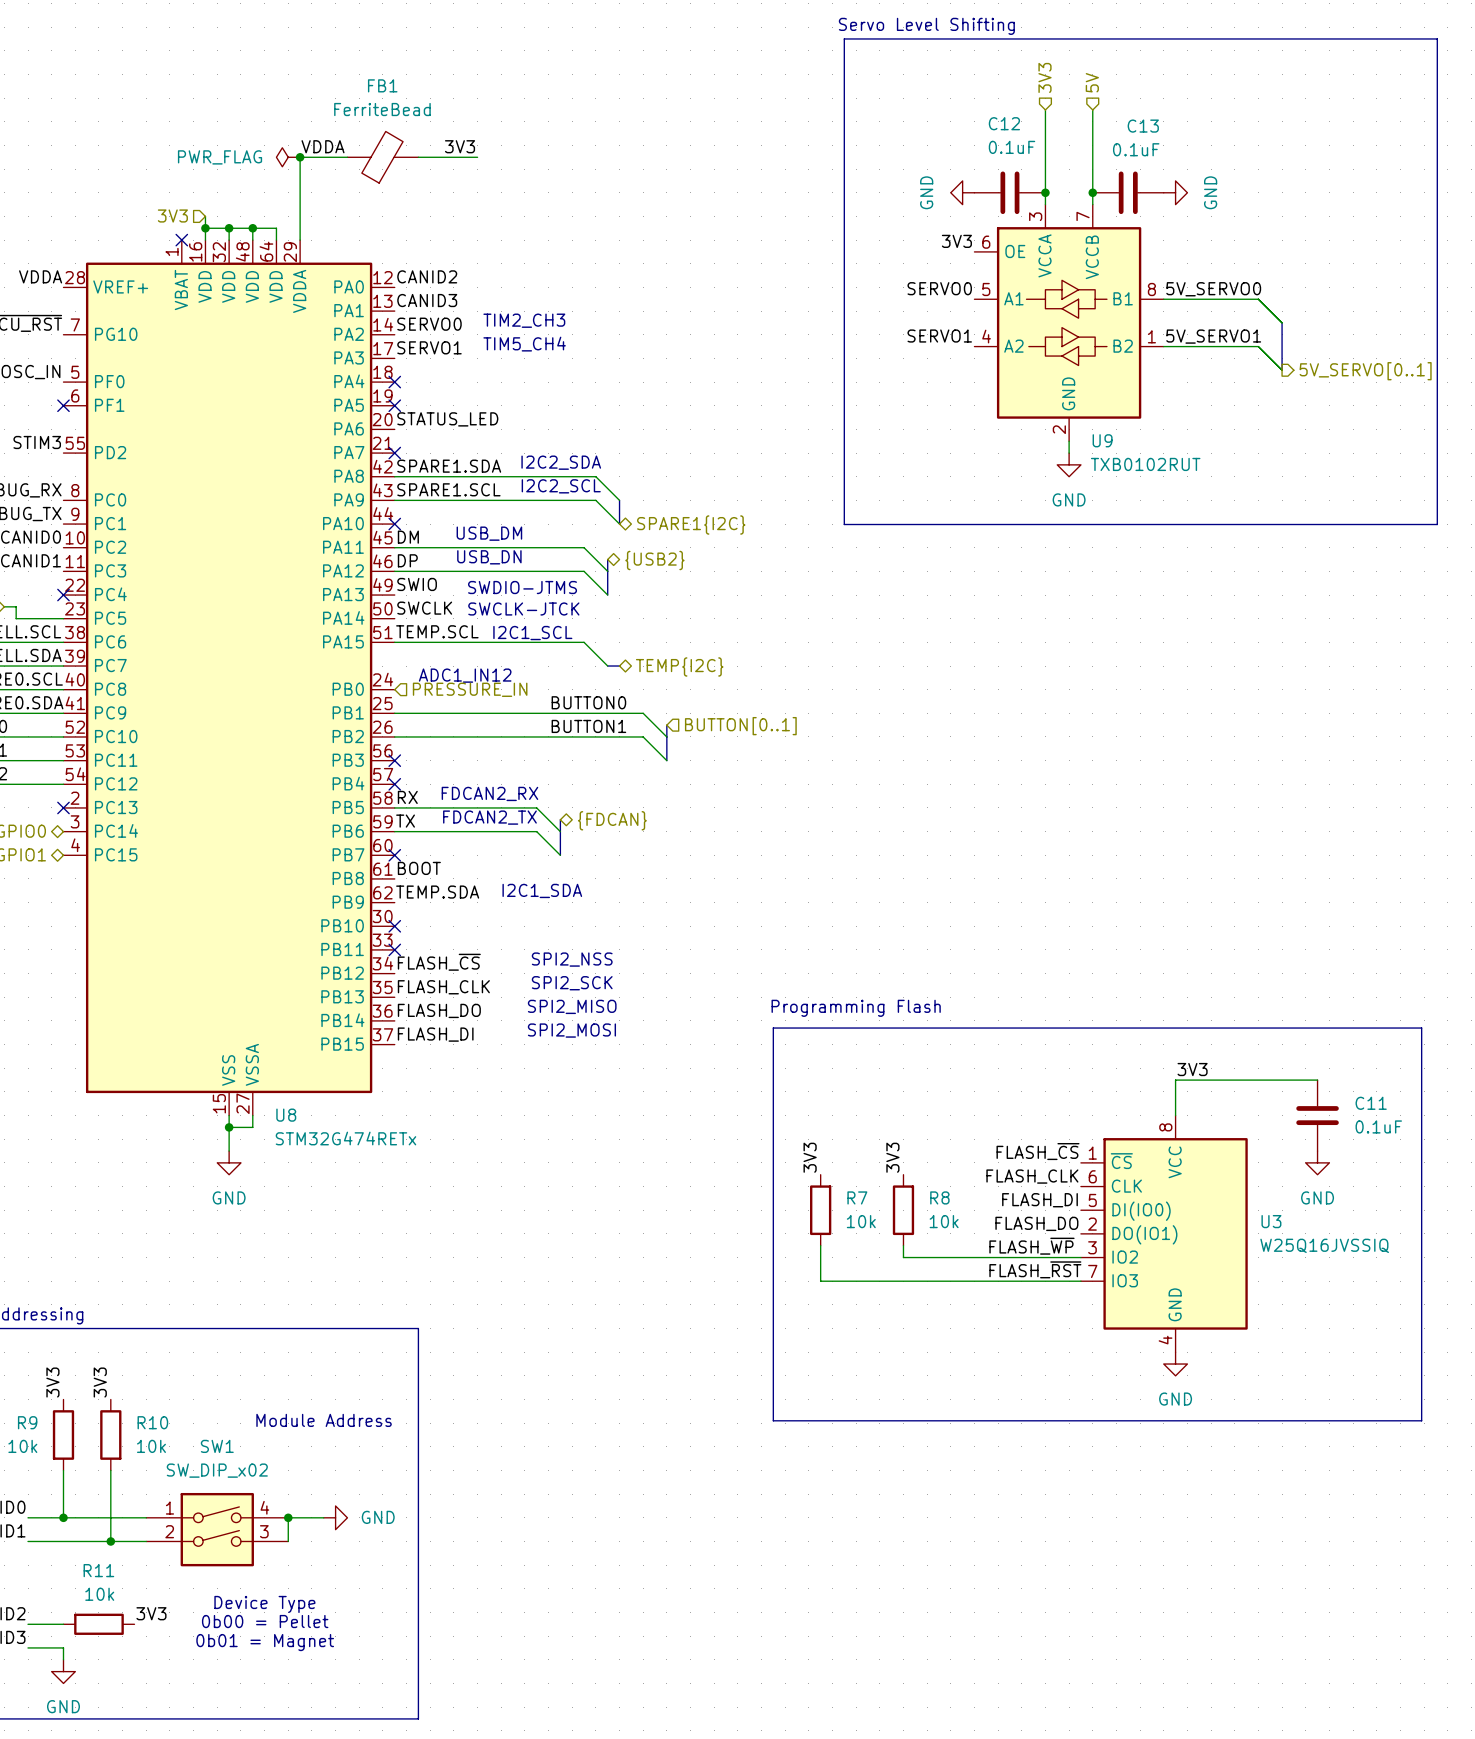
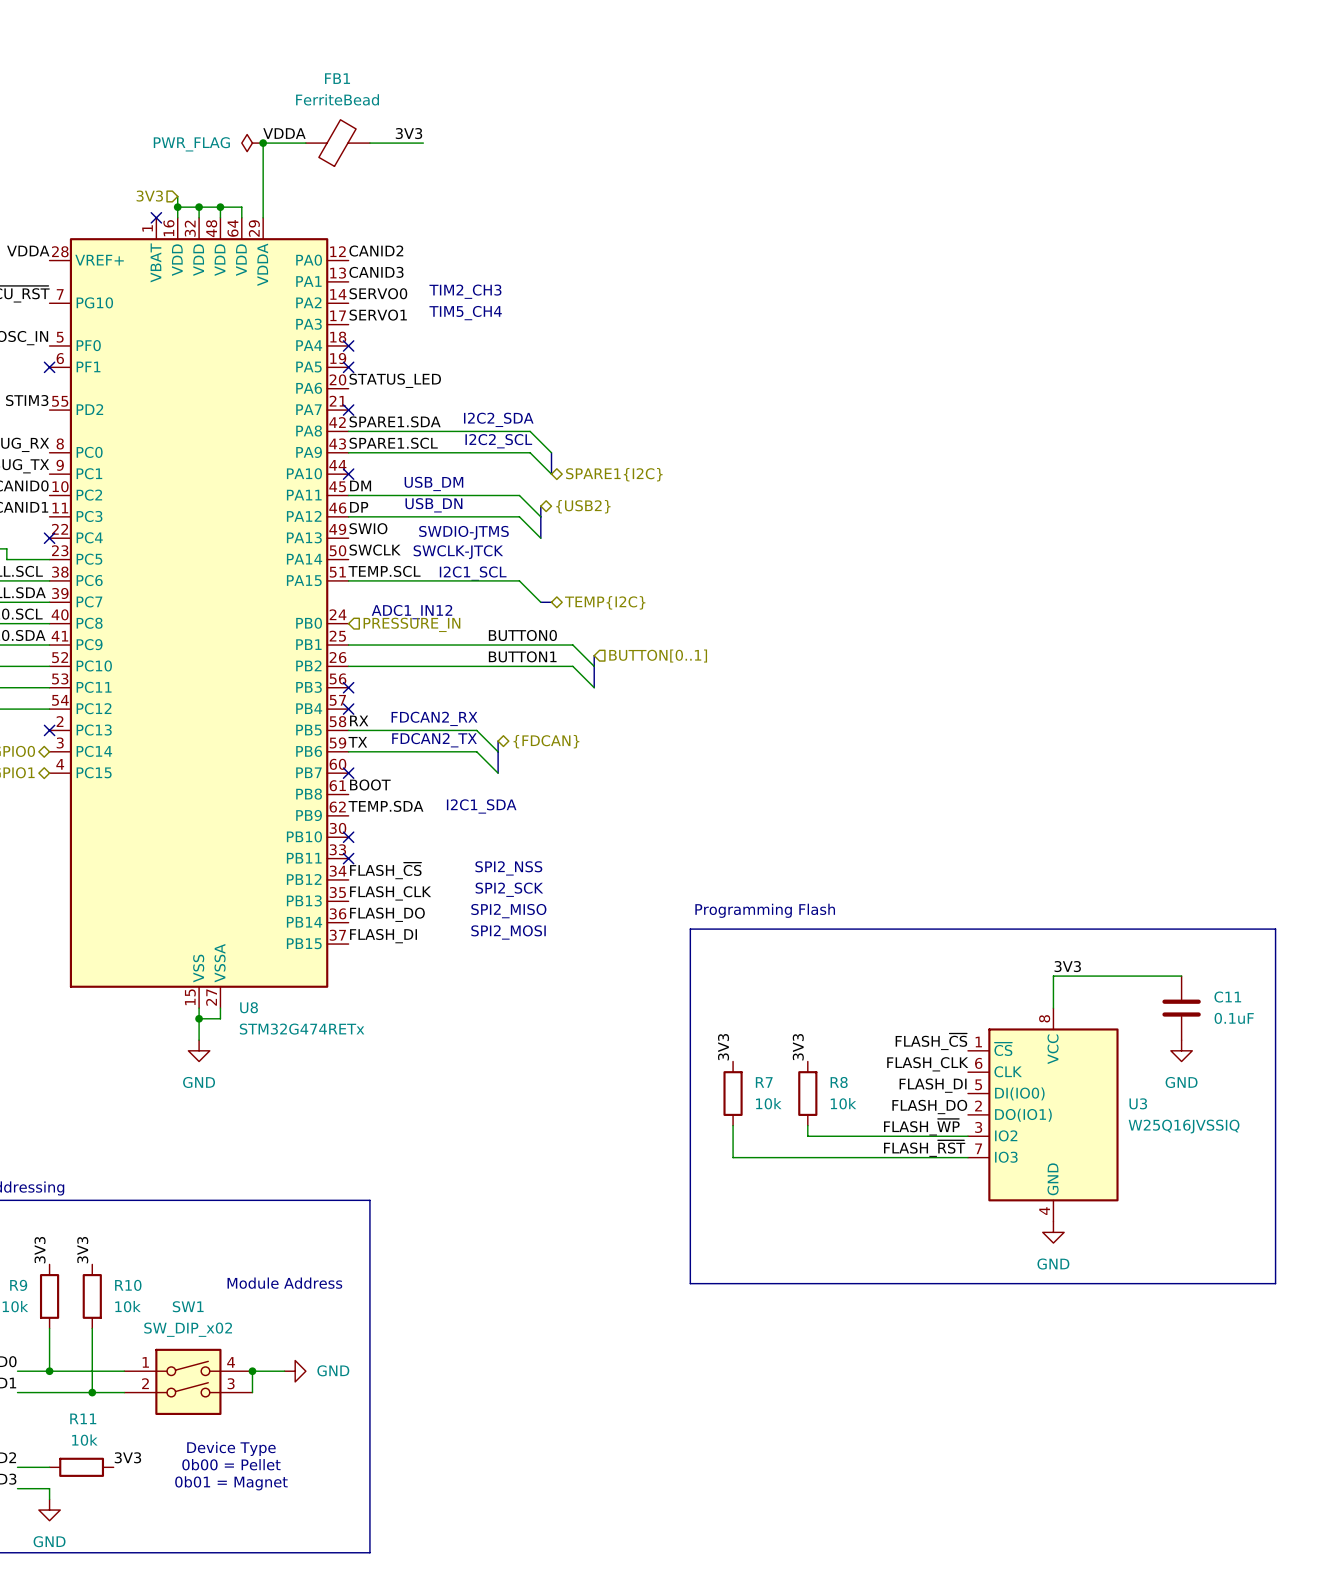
text: Servo Level Shifting (926, 26) -> none
line: (844, 38) (1437, 38) (1437, 524) (844, 524) (844, 38) -> none
hierarchical label: 3V3 (1045, 77) -> none
hierarchical label: 5V (1092, 82) -> none
wire: (1045, 109) (1045, 204) -> none
wire: (1092, 109) (1092, 204) -> none
power symbol: GND (962, 192) -> none
C12: 0.1uF (1009, 192) -> none
junction: (1045, 192) -> none
junction: (1092, 192) -> none
C13: 0.1uF (1128, 192) -> none
power symbol: GND (1175, 192) -> none
label: 3V3 (956, 241) -> none
label: SERVO0 (939, 288) -> none
label: 5V_SERVO0 (1213, 289) -> none
wire: (1163, 299) (1258, 299) (1282, 322) -> none
U9: TXB0102RUT (1069, 322) -> none
bus: (1282, 322) (1282, 370) -> none
label: SERVO1 (939, 336) -> none
label: 5V_SERVO1 (1213, 336) -> none
wire: (1163, 346) (1258, 346) (1282, 370) -> none
hierarchical label: 5V_SERVO[0..1] (1365, 371) -> none
wire: (1069, 441) (1069, 453) -> none
power symbol: GND (1069, 464) -> none

